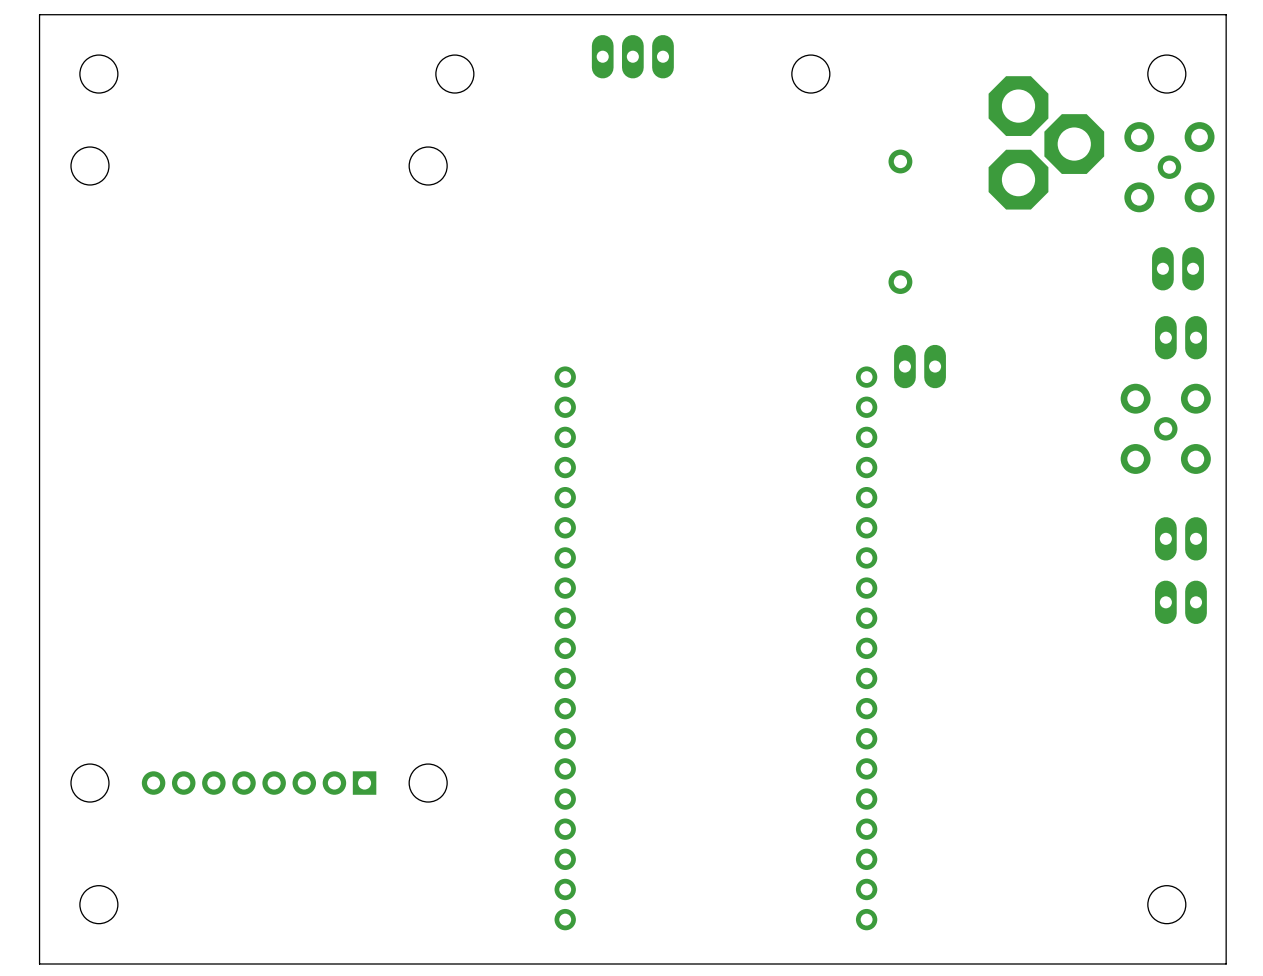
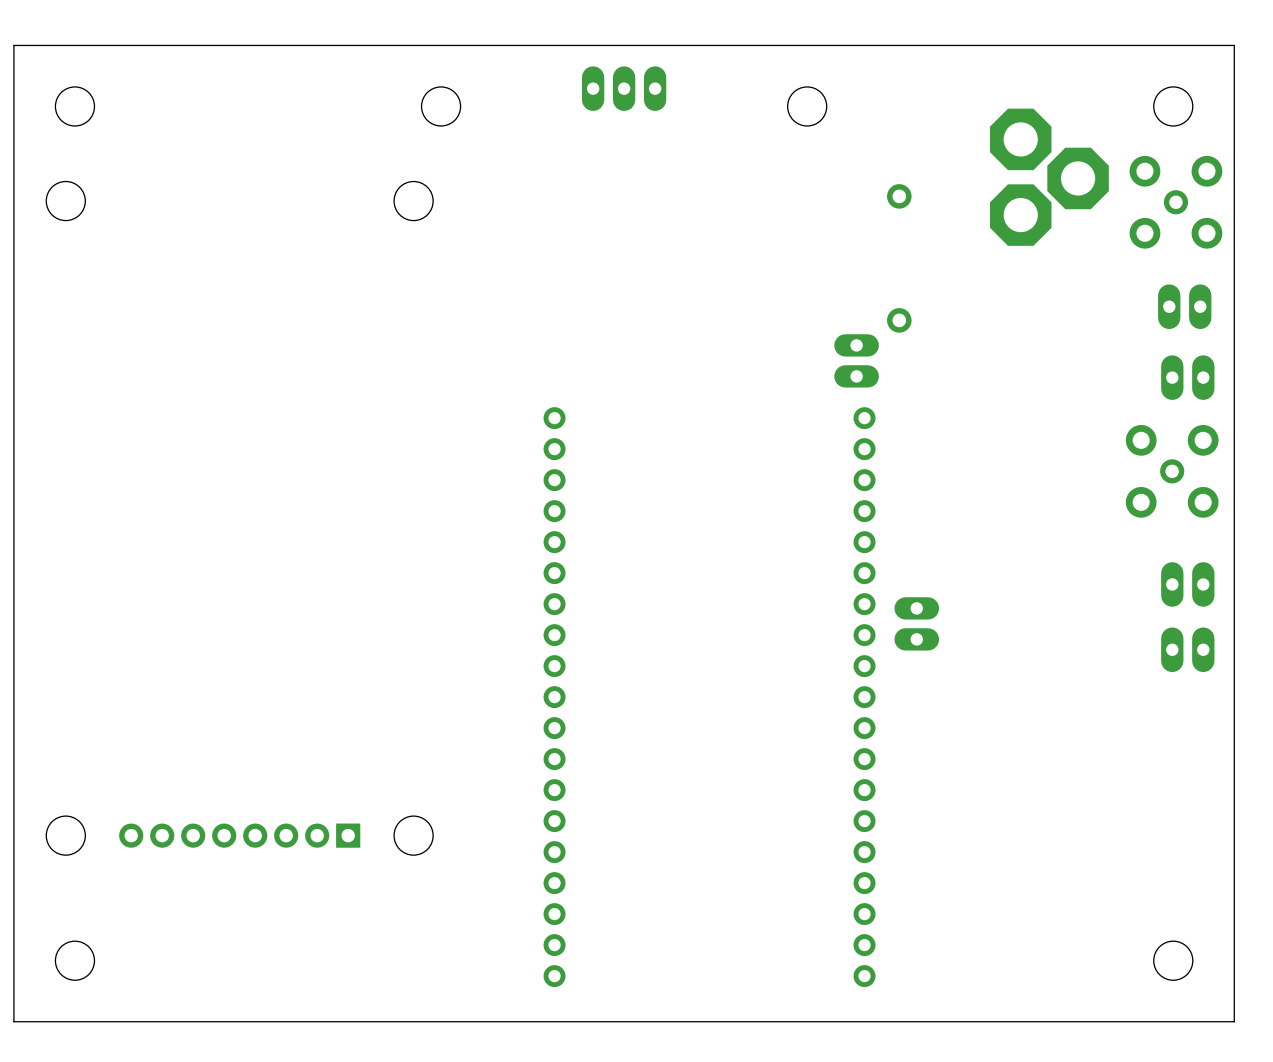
part rotation: 0° (920, 366) -> 90° clockwise (856, 360)
part position: (920, 366) -> (856, 360)
part: none -> (916, 623)

